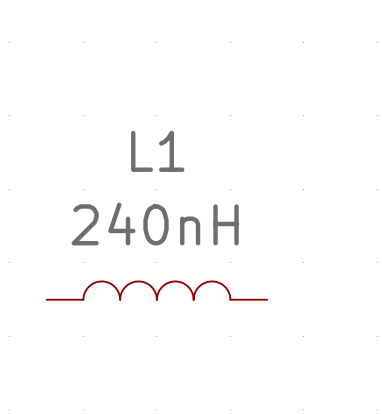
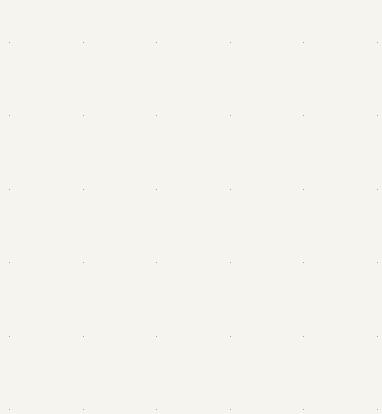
L1: 240nH (156, 290) -> none

